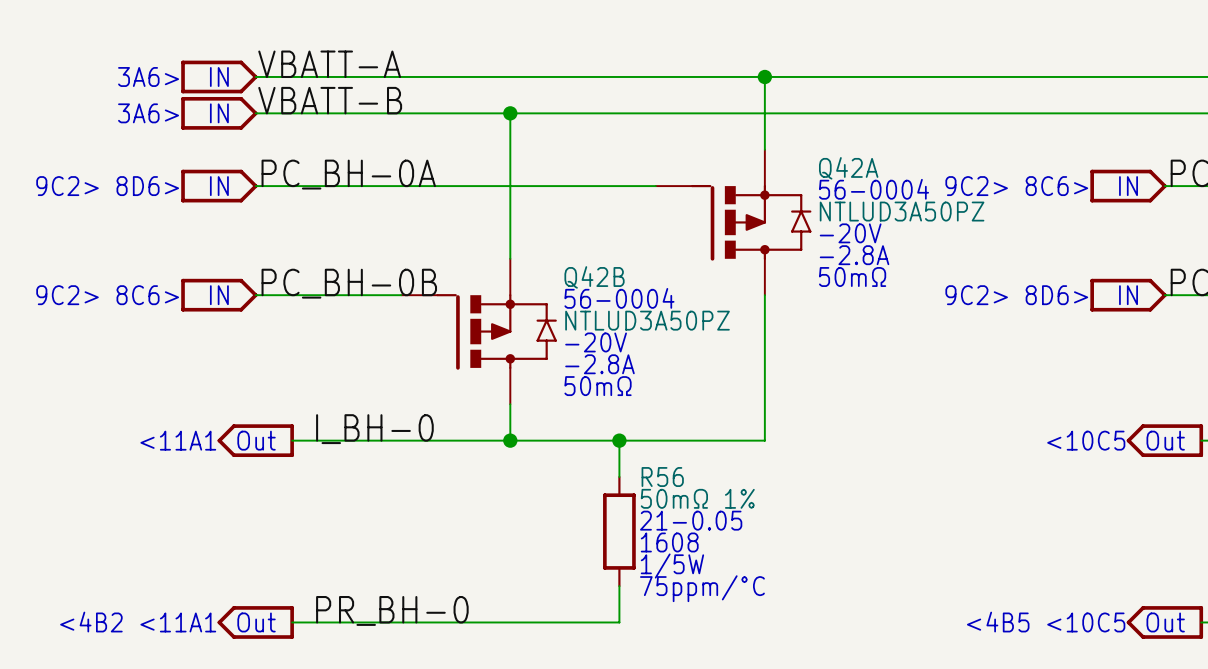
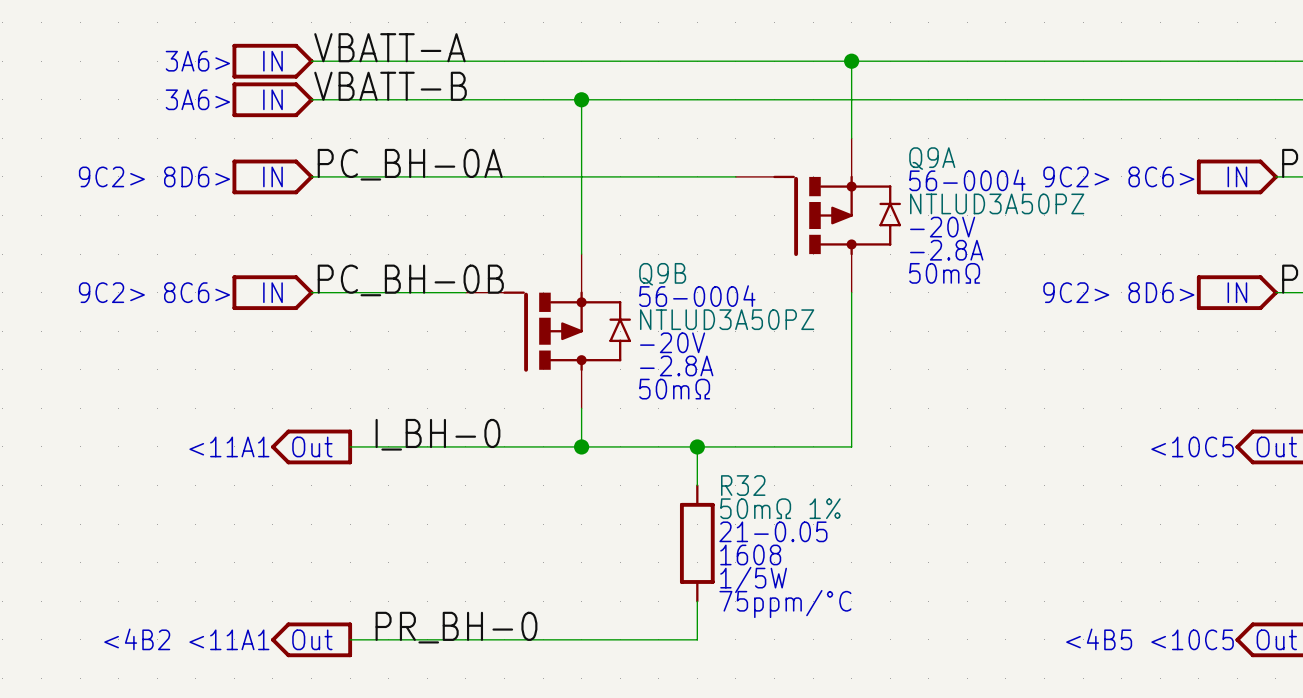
Q42A name: Q42A (848, 168) -> Q9A (932, 158)
Q42B name: Q42B (594, 277) -> Q9B (662, 274)
R56 name: R56 (662, 477) -> R32 (743, 485)

